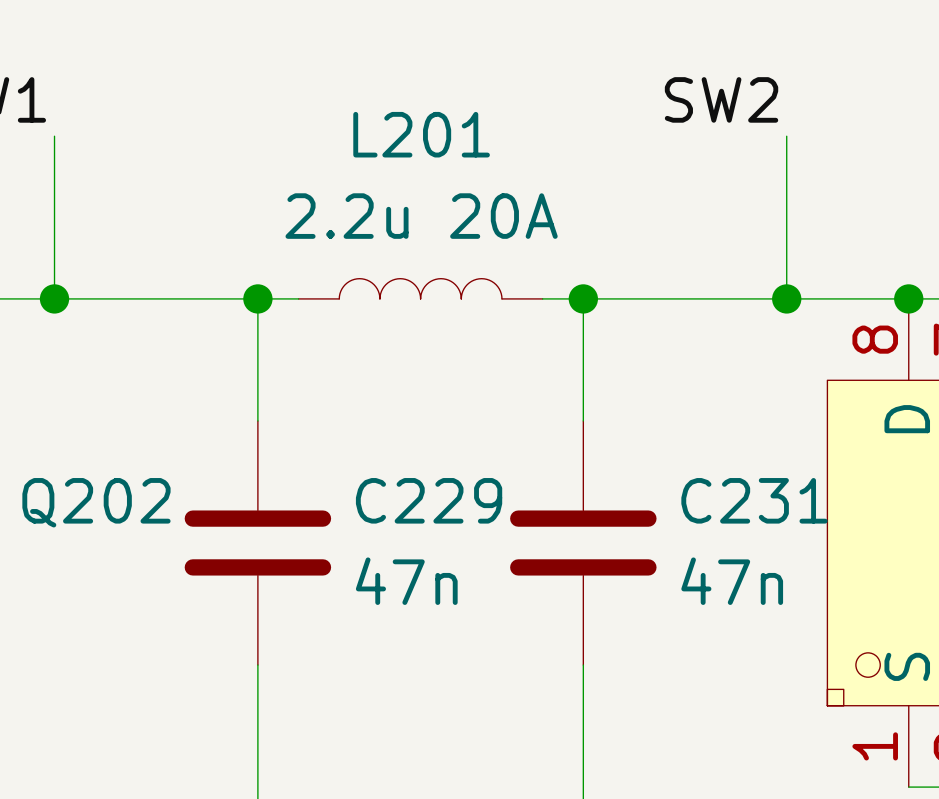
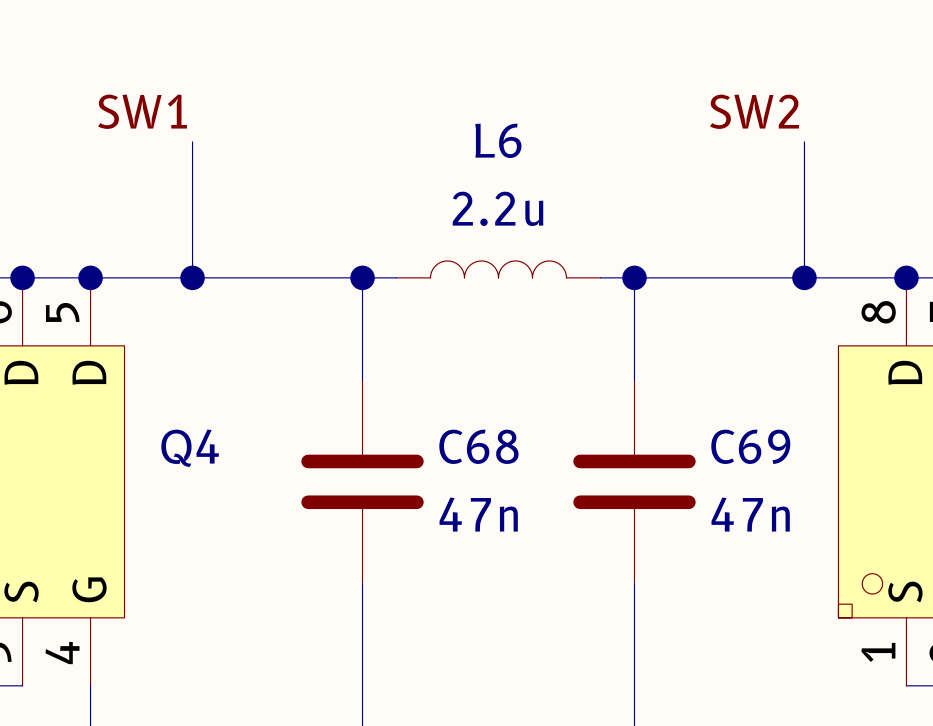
L201 name: L201 (421, 134) -> L6 (498, 140)
L201 value: 2.2u 20A (421, 216) -> 2.2u (497, 208)
C229 name: C229 (429, 500) -> C68 (478, 446)
C231 name: C231 (754, 500) -> C69 (750, 446)
Q202 name: Q202 (96, 502) -> Q4 (190, 448)

